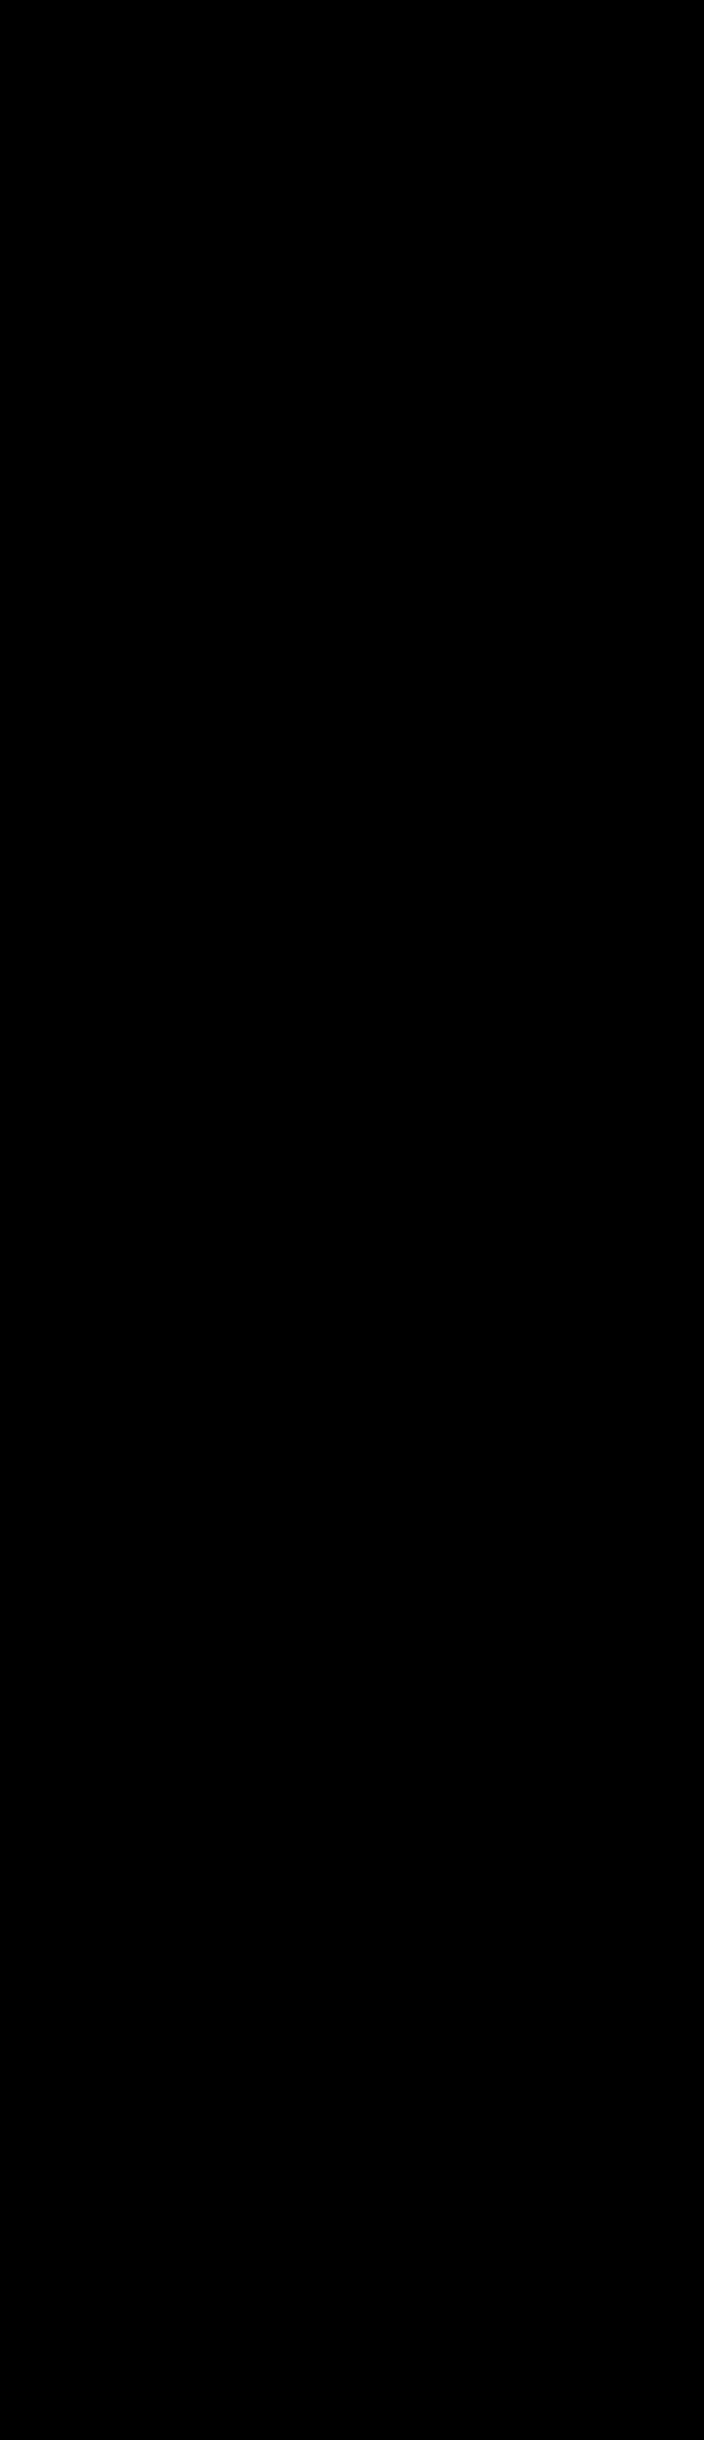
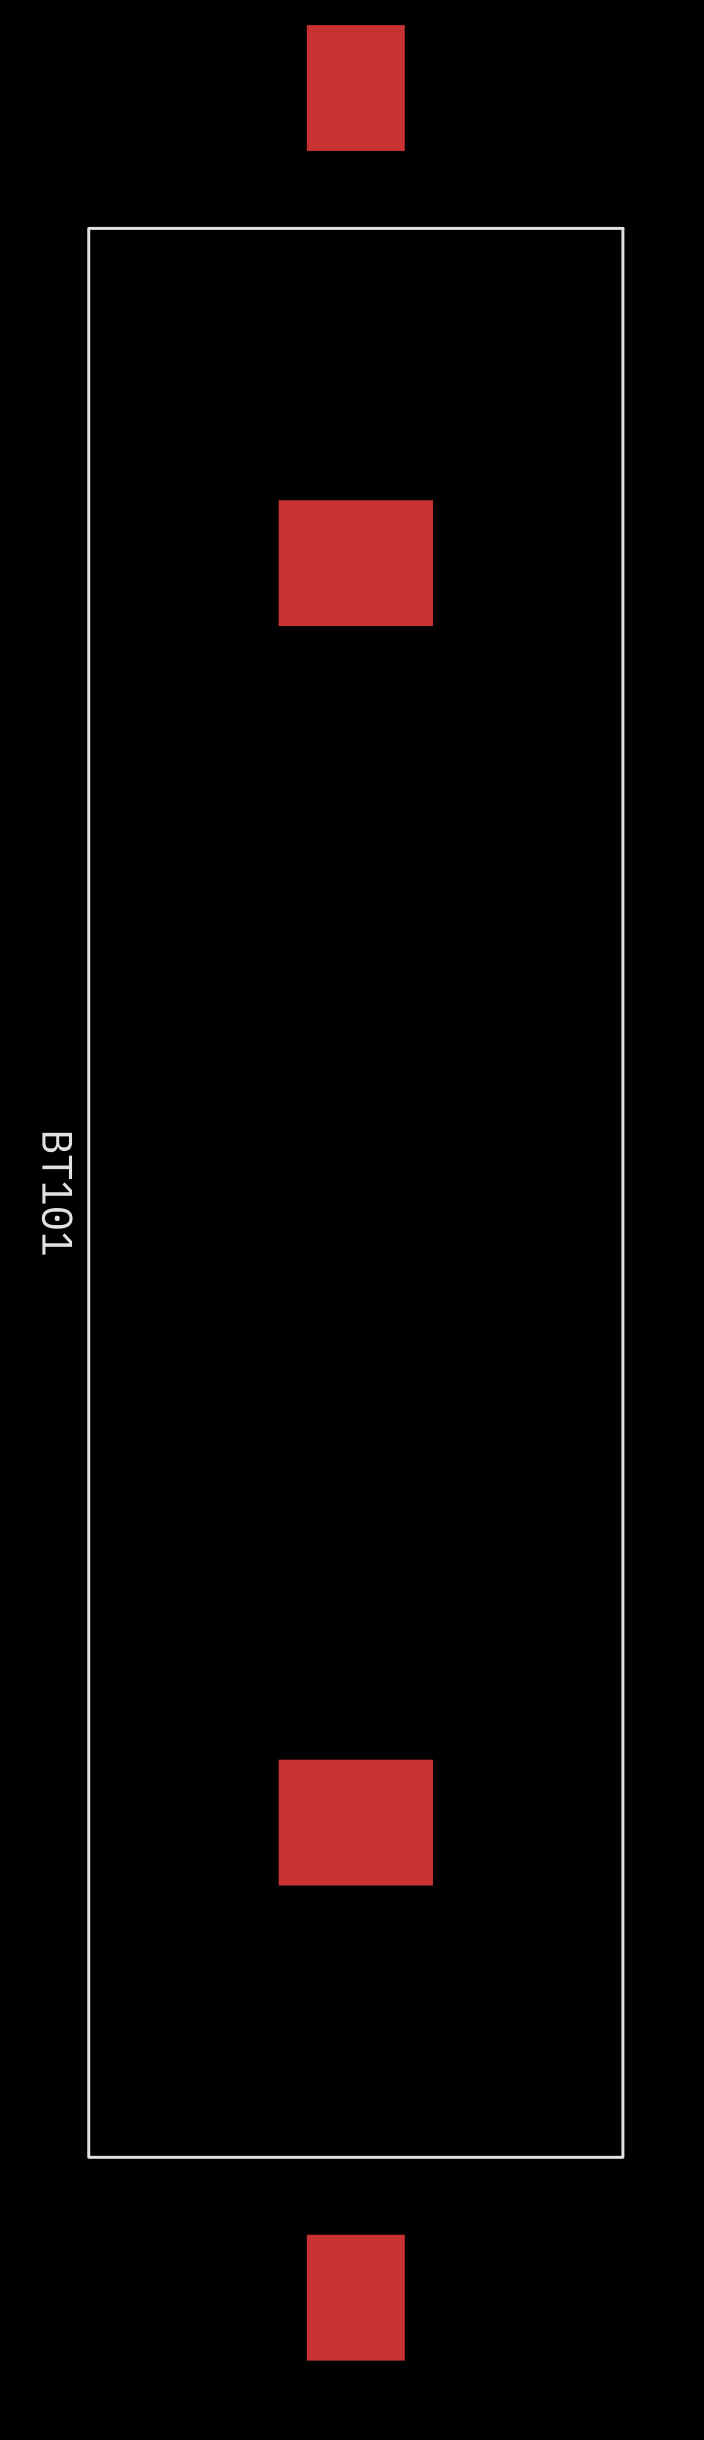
BT101: none -> (355, 1192)

